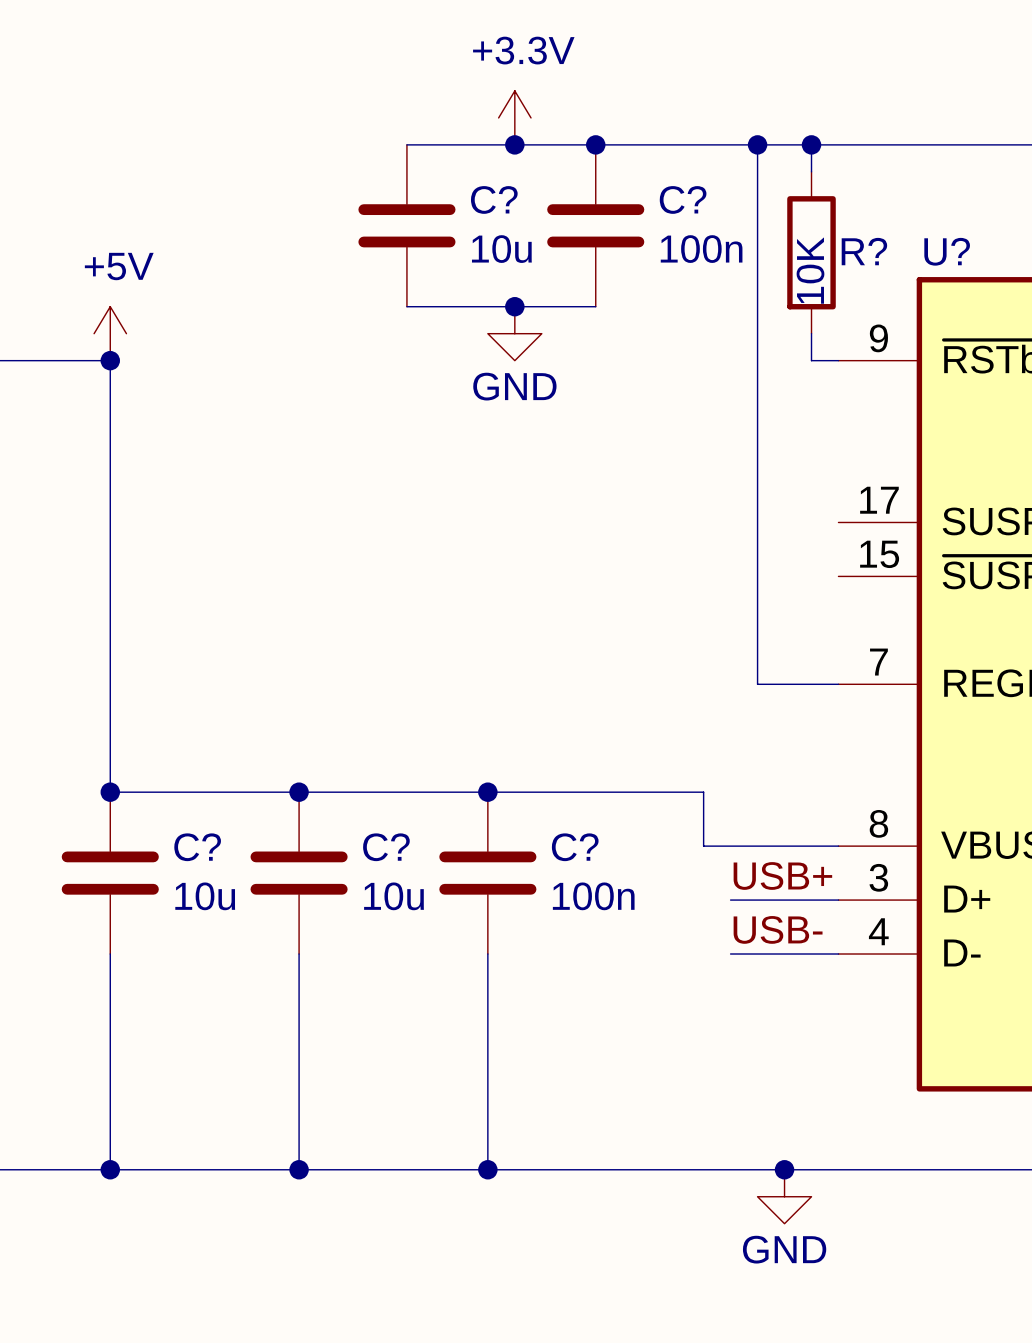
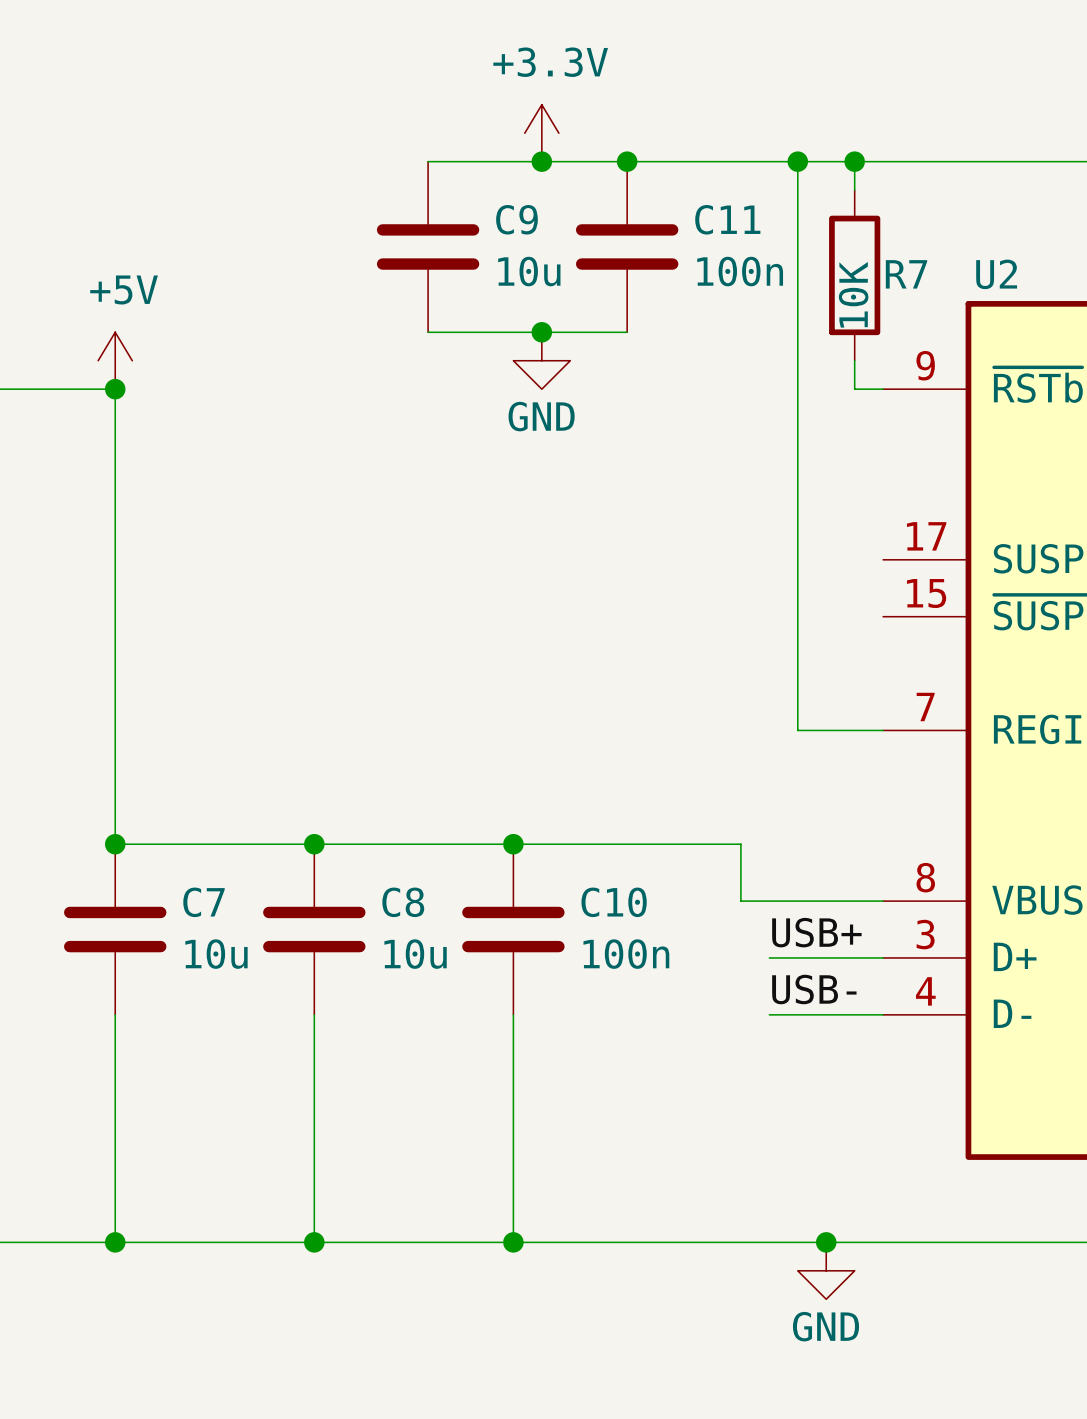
C? name: C? (494, 199) -> C9 (516, 219)
C? name: C? (683, 199) -> C11 (727, 219)
R? name: R? (864, 251) -> R7 (906, 274)
U? name: U? (947, 251) -> U2 (996, 274)
C? name: C? (197, 847) -> C7 (203, 902)
C? name: C? (386, 847) -> C8 (403, 902)
C? name: C? (575, 847) -> C10 (614, 902)

